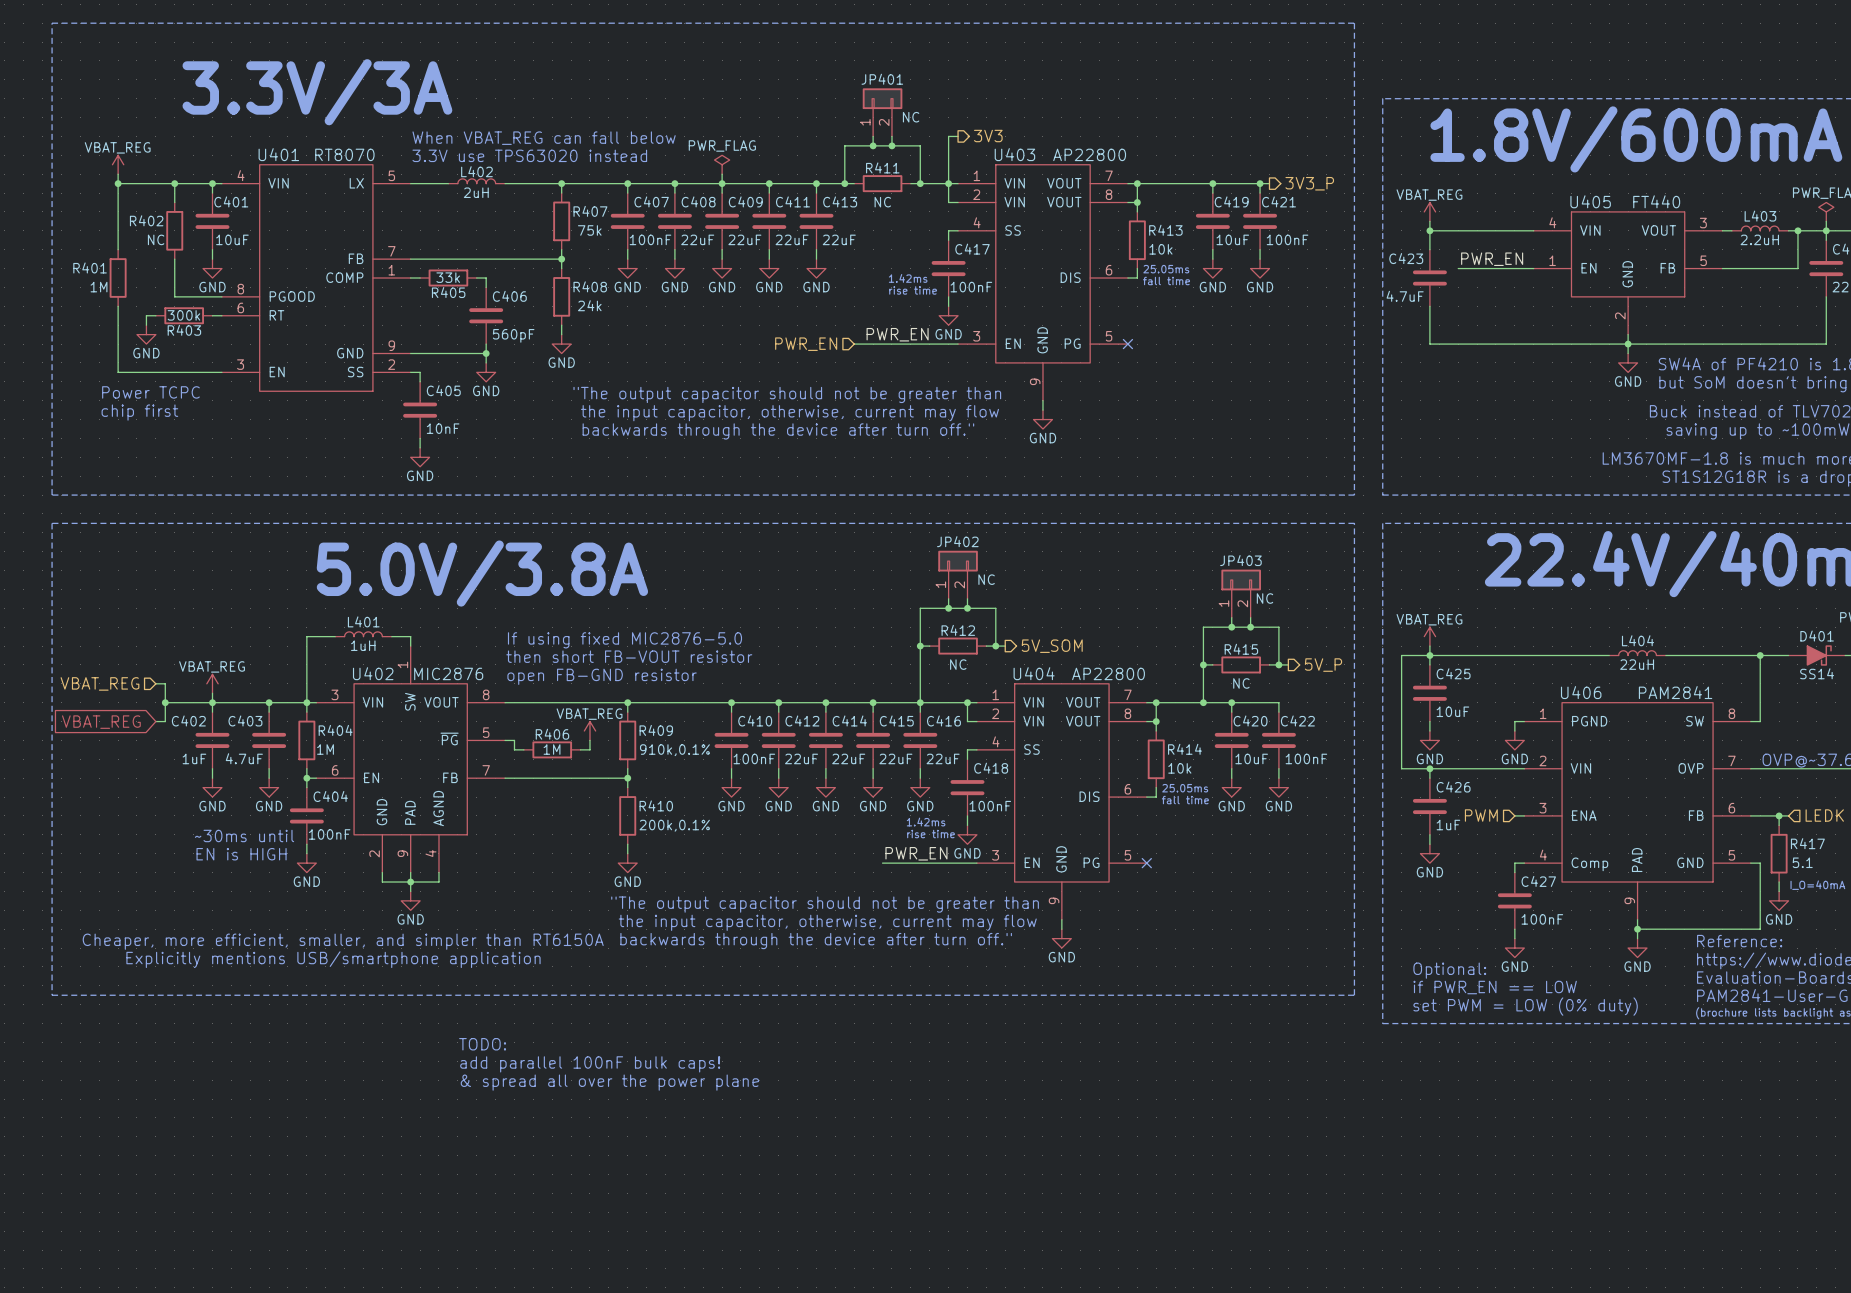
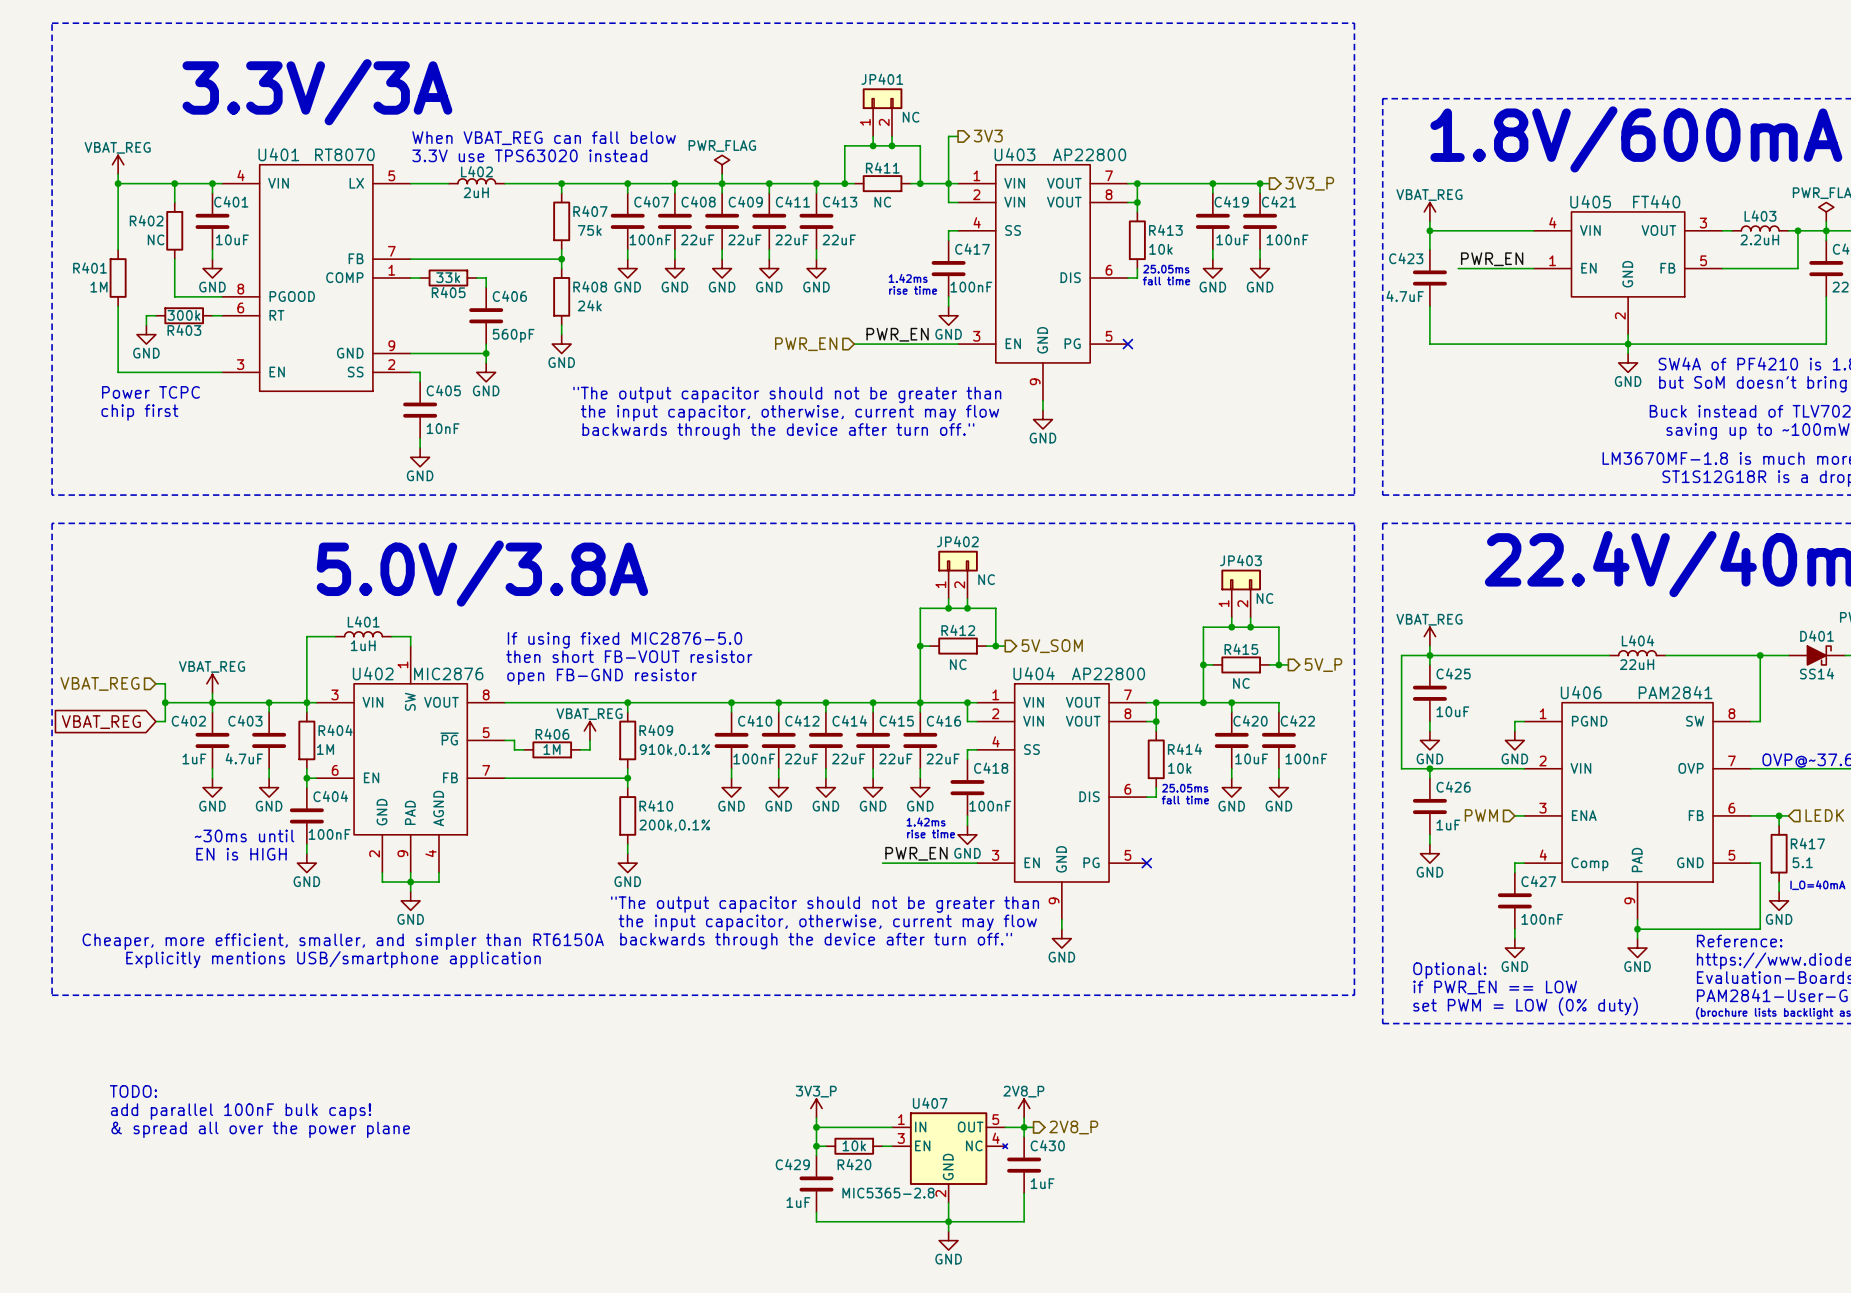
text: TODO: (482, 1044) -> none
text: add parallel 100nF bulk caps! (590, 1064) -> none
text: & spread all over the power plane (609, 1082) -> none
text: none -> TODO: (133, 1091)
power symbol: none -> 3V3_P (816, 1108)
power symbol: none -> 2V8_P (1024, 1108)
text: none -> add parallel 100nF bulk caps! (241, 1111)
wire: none -> (816, 1117) (816, 1155)
wire: none -> (1024, 1117) (1024, 1136)
wire: none -> (816, 1127) (891, 1127)
junction: none -> (816, 1127)
wire: none -> (1005, 1127) (1033, 1127)
junction: none -> (1024, 1127)
hierarchical label: none -> 2V8_P (1073, 1127)
text: none -> & spread all over the power plane (260, 1129)
wire: none -> (816, 1146) (825, 1146)
junction: none -> (816, 1146)
R420: none -> 10k (854, 1146)
wire: none -> (882, 1146) (891, 1146)
U407: none -> MIC5365-2.8 (949, 1157)
C430: none -> 1uF (1024, 1165)
C429: none -> 1uF (816, 1184)
wire: none -> (1024, 1193) (1024, 1221) (816, 1221) (816, 1212)
wire: none -> (948, 1202) (948, 1231)
junction: none -> (948, 1221)
power symbol: none -> GND (948, 1240)

